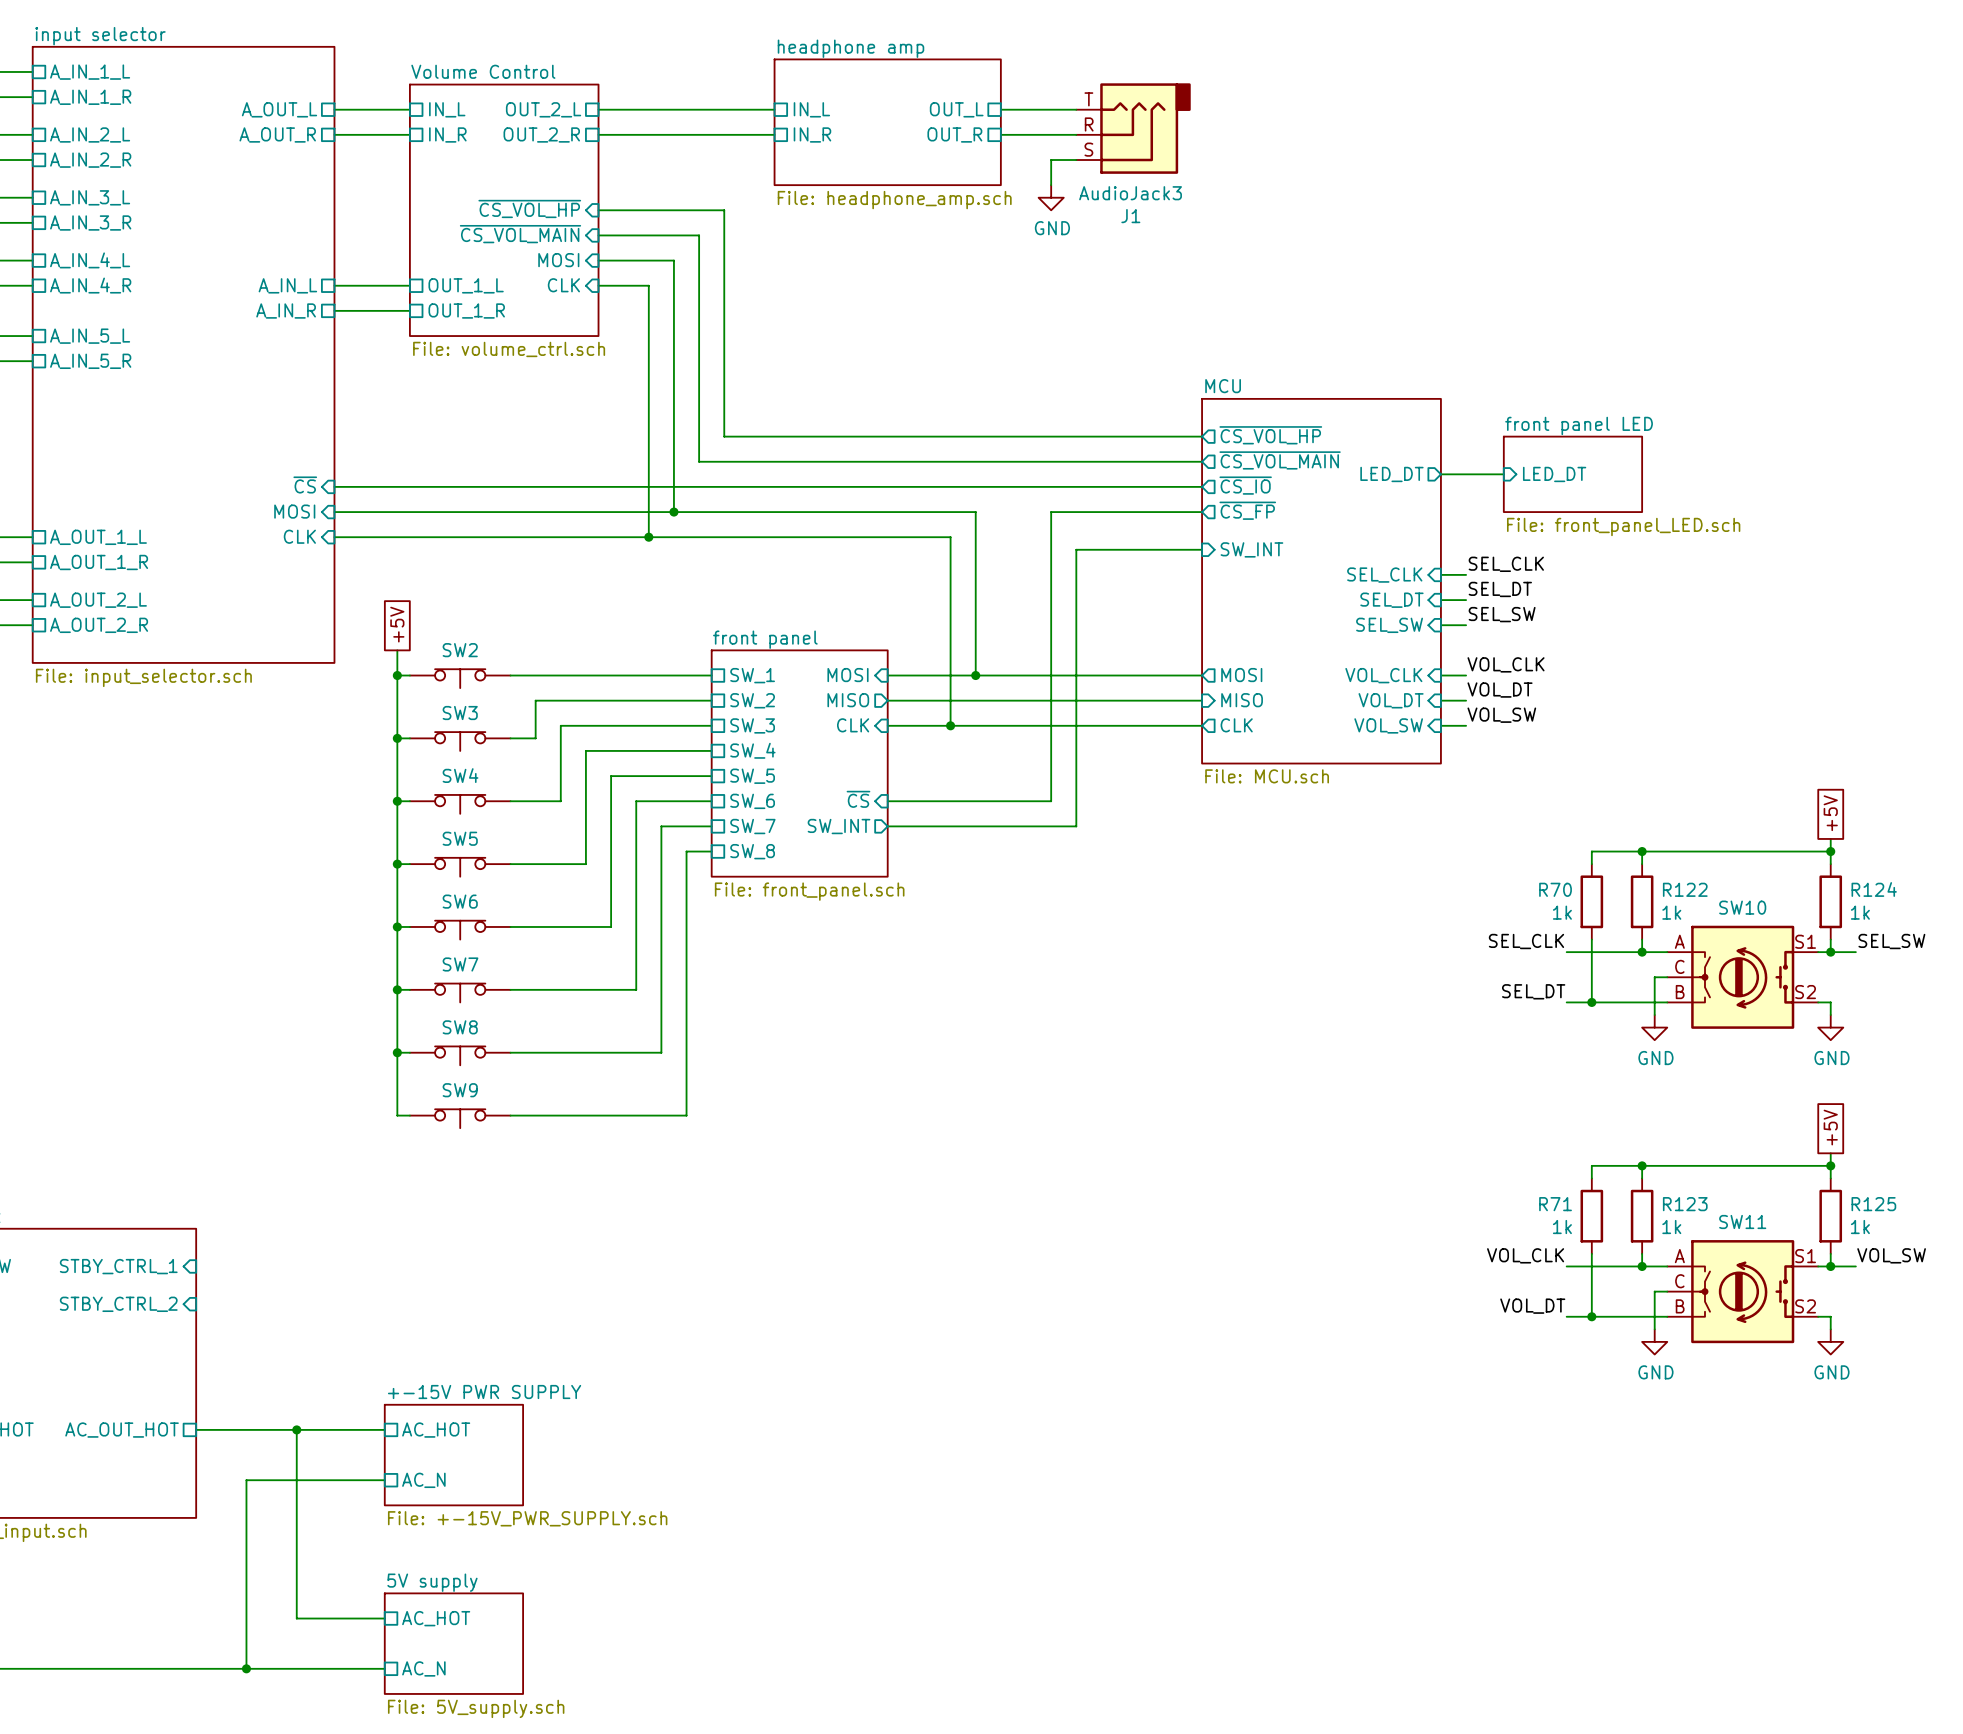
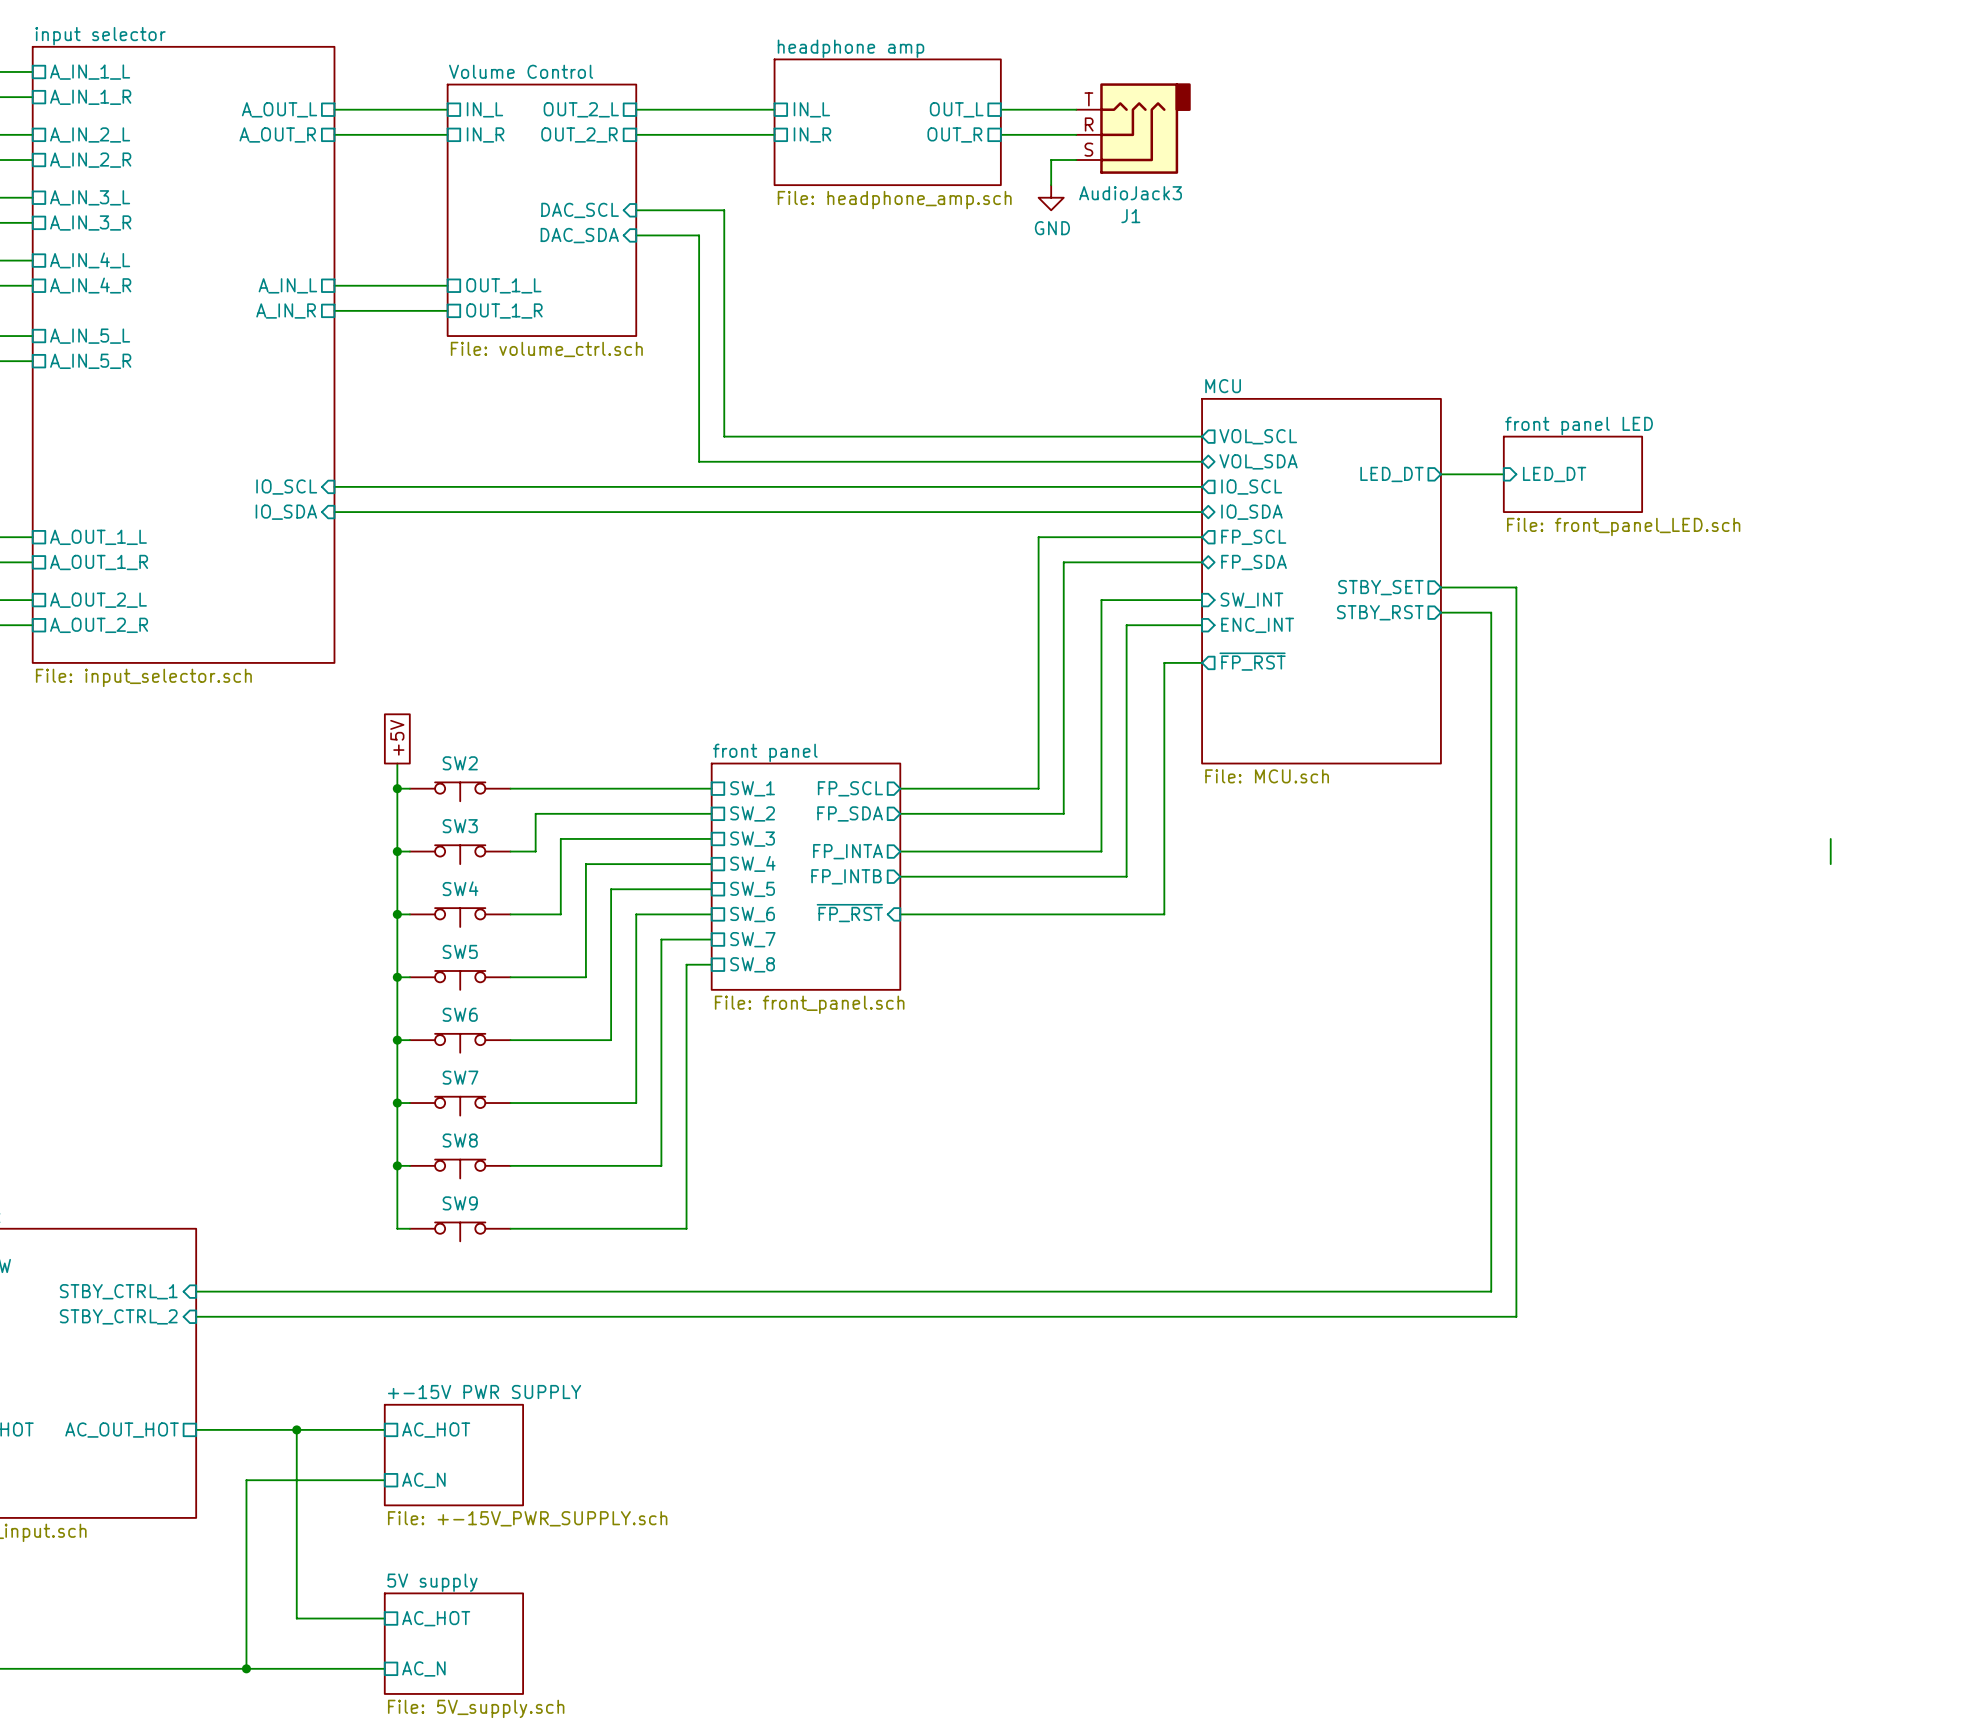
sheet pin position: IN_L (447, 109) -> IN_L (484, 109)
sheet pin position: OUT_2_L (543, 109) -> OUT_2_L (581, 109)
wire: (598, 109) (636, 109) -> (409, 109) (447, 109)
sheet pin position: IN_R (447, 134) -> IN_R (485, 134)
sheet pin position: OUT_2_R (541, 134) -> OUT_2_R (579, 134)
wire: (598, 134) (636, 134) -> (409, 134) (447, 134)
sheet pin: ~{CS_VOL_HP} (529, 208) -> none
sheet Volume Control position: (504, 210) -> (541, 210)
sheet pin: none -> DAC_SCL (580, 210)
wire: (598, 210) (636, 210) -> (409, 285) (447, 285)
sheet pin: ~{CS_VOL_MAIN} (520, 234) -> none
sheet pin: none -> DAC_SDA (579, 235)
wire: (598, 235) (636, 235) -> (409, 310) (447, 310)
sheet pin: MOSI (558, 260) -> none
wire: (598, 260) (673, 260) (673, 512) -> none
sheet pin position: OUT_1_L (466, 285) -> OUT_1_L (503, 285)
sheet pin: CLK (563, 285) -> none
wire: (598, 285) (648, 285) (648, 537) -> none
sheet pin position: OUT_1_R (466, 311) -> OUT_1_R (504, 311)
sheet pin: ~{CS_VOL_HP} (1270, 435) -> VOL_SCL (1258, 436)
sheet pin shape: output (1280, 460) -> bidirectional (1258, 461)
sheet pin: ~{CS_VOL_MAIN} (1280, 460) -> VOL_SDA (1258, 461)
sheet pin: ~{CS} (305, 484) -> IO_SCL (286, 487)
sheet pin: ~{CS_IO} (1245, 485) -> IO_SCL (1251, 487)
sheet pin shape: output (1247, 510) -> bidirectional (1251, 512)
sheet pin: ~{CS_FP} (1247, 510) -> IO_SDA (1251, 512)
sheet pin: MOSI (294, 511) -> IO_SDA (286, 512)
junction: (673, 512) -> none
wire: (975, 512) (975, 675) -> (975, 512) (1051, 512)
wire: (1051, 512) (1051, 801) (887, 801) -> none
sheet pin: CLK (299, 536) -> none
wire: (334, 537) (950, 537) (950, 725) -> none
junction: (648, 537) -> none
wire: none -> (1202, 537) (1038, 537) (1038, 788) (900, 788)
sheet pin: none -> FP_SCL (1253, 537)
wire: (1202, 549) (1076, 549) (1076, 826) (887, 826) -> none
sheet pin position: SW_INT (1251, 549) -> SW_INT (1251, 600)
wire: none -> (1202, 562) (1063, 562) (1063, 813) (900, 813)
sheet pin: none -> FP_SDA (1254, 562)
label: SEL_CLK (1506, 564) -> none
wire: (1440, 574) (1466, 574) -> none
sheet pin: SEL_CLK (1384, 575) -> none
sheet pin: none -> STBY_SET (1380, 587)
wire: none -> (1440, 587) (1516, 587) (1516, 1316) (196, 1316)
label: SEL_DT (1500, 589) -> none
wire: none -> (1202, 600) (1101, 600) (1101, 851) (900, 851)
sheet pin: SEL_DT (1391, 600) -> none
wire: (1440, 600) (1466, 600) -> none
sheet pin: none -> STBY_RST (1380, 612)
wire: none -> (1440, 612) (1491, 612) (1491, 1291) (196, 1291)
label: SEL_SW (1502, 614) -> none
global label position: +5V (397, 624) -> +5V (397, 737)
wire: none -> (1202, 625) (1126, 625) (1126, 876) (900, 876)
sheet pin: none -> ENC_INT (1257, 625)
sheet pin: SEL_SW (1389, 625) -> none
wire: (1440, 625) (1466, 625) -> none
wire: (397, 650) (397, 763) -> none
sheet pin: none -> ~{FP_RST} (1252, 661)
wire: none -> (1202, 662) (1164, 662) (1164, 914) (900, 914)
label: VOL_CLK (1506, 664) -> none
wire: (397, 675) (409, 675) -> (397, 788) (409, 788)
junction: (397, 675) -> none
wire: (510, 675) (711, 675) -> (510, 788) (711, 788)
sheet pin position: SW_1 (752, 675) -> SW_1 (752, 788)
sheet pin: MOSI (848, 675) -> none
wire: (887, 675) (1202, 675) -> none
junction: (975, 675) -> none
sheet pin: MOSI (1241, 675) -> none
sheet pin: VOL_CLK (1383, 675) -> none
wire: (1440, 675) (1466, 675) -> none
SW2 position: (460, 678) -> (460, 791)
label: VOL_DT (1500, 690) -> none
wire: (711, 700) (535, 700) (535, 738) (510, 738) -> (711, 813) (535, 813) (535, 851) (510, 851)
sheet pin position: SW_2 (752, 700) -> SW_2 (752, 813)
sheet pin: MISO (848, 700) -> none
wire: (887, 700) (1202, 700) -> none
sheet pin: MISO (1242, 700) -> none
sheet pin: VOL_DT (1391, 700) -> none
wire: (1440, 700) (1466, 700) -> none
label: VOL_SW (1501, 715) -> none
wire: (711, 725) (560, 725) (560, 801) (510, 801) -> (711, 838) (560, 838) (560, 914) (510, 914)
sheet pin position: SW_3 (752, 725) -> SW_3 (752, 839)
sheet pin: CLK (853, 725) -> none
wire: (887, 725) (1202, 725) -> none
junction: (950, 725) -> none
sheet pin: CLK (1236, 725) -> none
sheet pin: VOL_SW (1388, 725) -> none
wire: (1440, 725) (1466, 725) -> none
wire: (397, 738) (409, 738) -> (397, 851) (409, 851)
junction: (397, 738) -> none
SW3 position: (460, 741) -> (460, 854)
wire: (711, 750) (585, 750) (585, 864) (510, 864) -> (711, 864) (585, 864) (585, 977) (510, 977)
sheet pin position: SW_4 (752, 750) -> SW_4 (752, 863)
sheet front panel: File: front_panel.sch (799, 763) -> none
wire: (711, 776) (611, 776) (611, 889) -> (711, 889) (611, 889)
sheet pin position: SW_5 (752, 776) -> SW_5 (752, 889)
sheet pin: none -> FP_SCL (850, 788)
sheet pin: ~{CS} (858, 799) -> none
wire: (397, 801) (409, 801) -> (397, 914) (409, 914)
junction position: (397, 801) -> (397, 788)
wire: (711, 801) (636, 801) (636, 914) -> (711, 914) (636, 914)
sheet pin position: SW_6 (752, 801) -> SW_6 (752, 914)
SW4 position: (460, 804) -> (460, 917)
sheet pin: none -> FP_SDA (850, 813)
global label: +5V (1830, 813) -> none
wire: (711, 826) (661, 826) (661, 939) -> (711, 939) (661, 939)
sheet pin position: SW_7 (752, 826) -> SW_7 (752, 939)
sheet pin: SW_INT (839, 826) -> FP_INTA (848, 851)
wire: (711, 851) (686, 851) (686, 964) -> (711, 964) (686, 964)
sheet pin position: SW_8 (752, 851) -> SW_8 (752, 964)
wire: (1642, 851) (1642, 864) -> none
junction: (1642, 851) -> none
wire: (1830, 851) (1591, 851) (1591, 864) -> none
junction: (1830, 851) -> none
wire: (397, 864) (409, 864) -> (397, 977) (409, 977)
junction position: (397, 864) -> (397, 851)
SW5 position: (460, 867) -> (460, 980)
sheet front panel: none -> File: front_panel.sch (805, 876)
sheet pin: none -> FP_INTB (846, 876)
R70: 1k (1591, 901) -> none
R122: 1k (1642, 901) -> none
R124: 1k (1830, 901) -> none
sheet pin: none -> ~{FP_RST} (849, 913)
wire: (397, 926) (409, 926) -> (397, 1040) (409, 1040)
junction position: (397, 926) -> (397, 914)
wire: (510, 926) (611, 926) -> (510, 1040) (611, 1040) (611, 926)
SW6 position: (460, 930) -> (460, 1043)
wire: (1591, 939) (1591, 1002) -> none
wire: (1642, 939) (1642, 952) -> none
wire: (1830, 939) (1830, 952) -> none
label: SEL_CLK (1526, 941) -> none
label: SEL_SW (1891, 941) -> none
wire: (1566, 952) (1667, 952) -> none
junction: (1642, 952) -> none
wire: (1818, 952) (1855, 952) -> none
junction: (1830, 952) -> none
wire: (1667, 977) (1654, 977) (1654, 1015) -> none
SW10: (1742, 977) -> none
wire: (397, 989) (409, 989) -> (397, 1103) (409, 1103)
junction position: (397, 989) -> (397, 977)
wire: (510, 989) (636, 989) -> (510, 1103) (636, 1103) (636, 989)
label: SEL_DT (1533, 991) -> none
SW7 position: (460, 992) -> (460, 1106)
wire: (1566, 1002) (1667, 1002) -> none
junction: (1591, 1002) -> none
wire: (1818, 1002) (1830, 1002) (1830, 1015) -> none
power symbol: GND (1654, 1027) -> none
power symbol: GND (1830, 1027) -> none
wire: (397, 1052) (409, 1052) -> (397, 1165) (409, 1165)
junction position: (397, 1052) -> (397, 1040)
wire: (510, 1052) (661, 1052) -> (510, 1165) (661, 1165) (661, 1052)
SW8 position: (460, 1055) -> (460, 1169)
junction: none -> (397, 1103)
wire: (397, 1115) (409, 1115) -> (397, 1115) (397, 1228) (409, 1228)
wire: (510, 1115) (686, 1115) -> (510, 1228) (686, 1228) (686, 1115)
SW9 position: (460, 1118) -> (460, 1231)
global label: +5V (1830, 1127) -> none
wire: (1830, 1153) (1830, 1178) -> none
junction: none -> (397, 1165)
wire: (1642, 1165) (1642, 1178) -> none
junction: (1642, 1165) -> none
wire: (1830, 1165) (1591, 1165) (1591, 1178) -> none
junction: (1830, 1165) -> none
R71: 1k (1591, 1216) -> none
R123: 1k (1642, 1216) -> none
R125: 1k (1830, 1216) -> none
wire: (1591, 1253) (1591, 1316) -> none
wire: (1642, 1253) (1642, 1266) -> none
wire: (1830, 1253) (1830, 1266) -> none
label: VOL_CLK (1525, 1255) -> none
label: VOL_SW (1891, 1255) -> none
sheet pin position: STBY_CTRL_1 (118, 1266) -> STBY_CTRL_1 (118, 1291)
wire: (1566, 1266) (1667, 1266) -> none
junction: (1642, 1266) -> none
wire: (1818, 1266) (1855, 1266) -> none
junction: (1830, 1266) -> none
wire: (1667, 1291) (1654, 1291) (1654, 1329) -> none
SW11: (1742, 1291) -> none
sheet pin position: STBY_CTRL_2 (118, 1304) -> STBY_CTRL_2 (118, 1316)
label: VOL_DT (1532, 1306) -> none
wire: (1566, 1316) (1667, 1316) -> none
junction: (1591, 1316) -> none
wire: (1818, 1316) (1830, 1316) (1830, 1329) -> none
power symbol: GND (1654, 1341) -> none
power symbol: GND (1830, 1341) -> none

